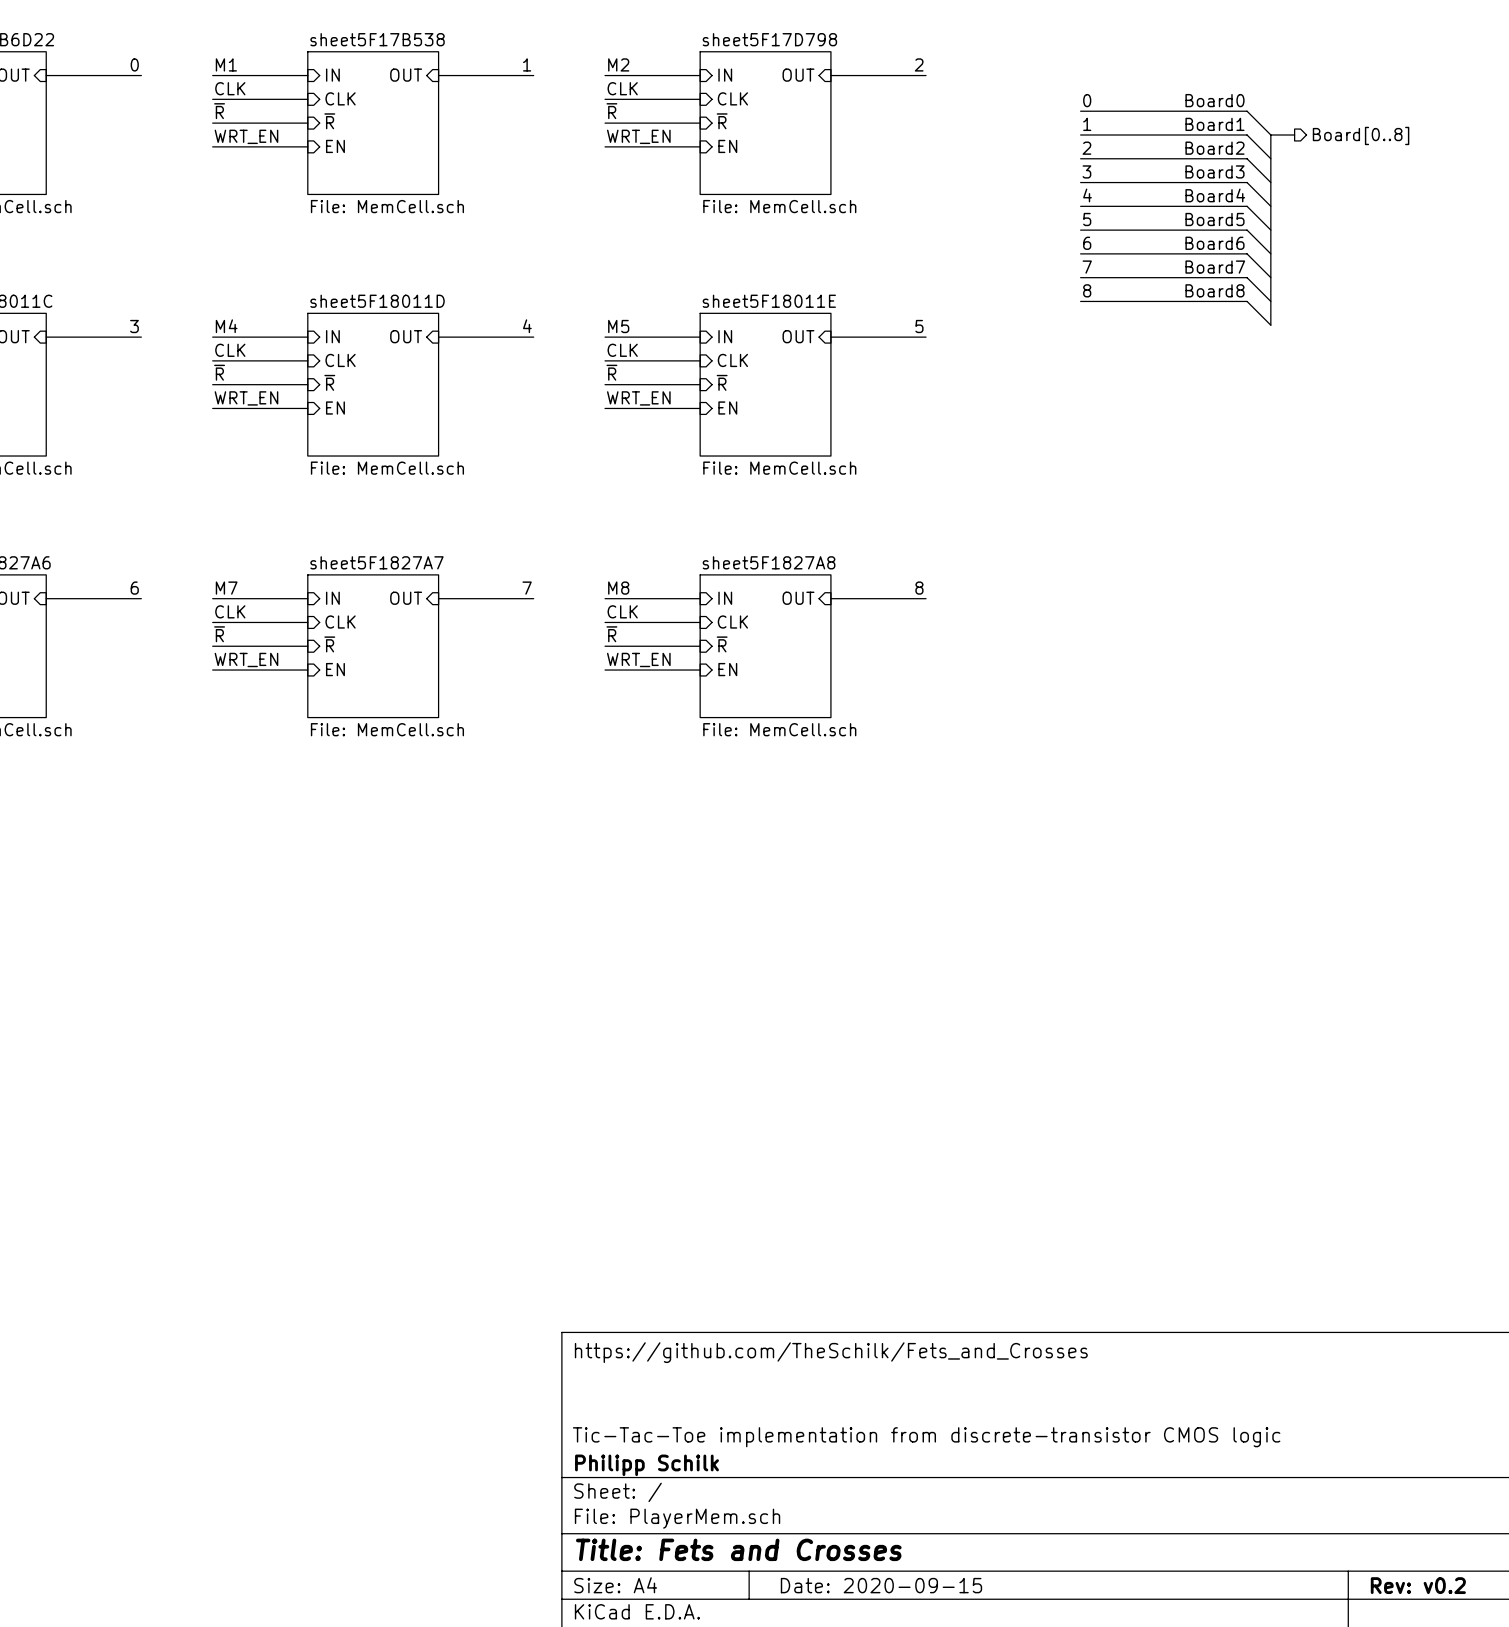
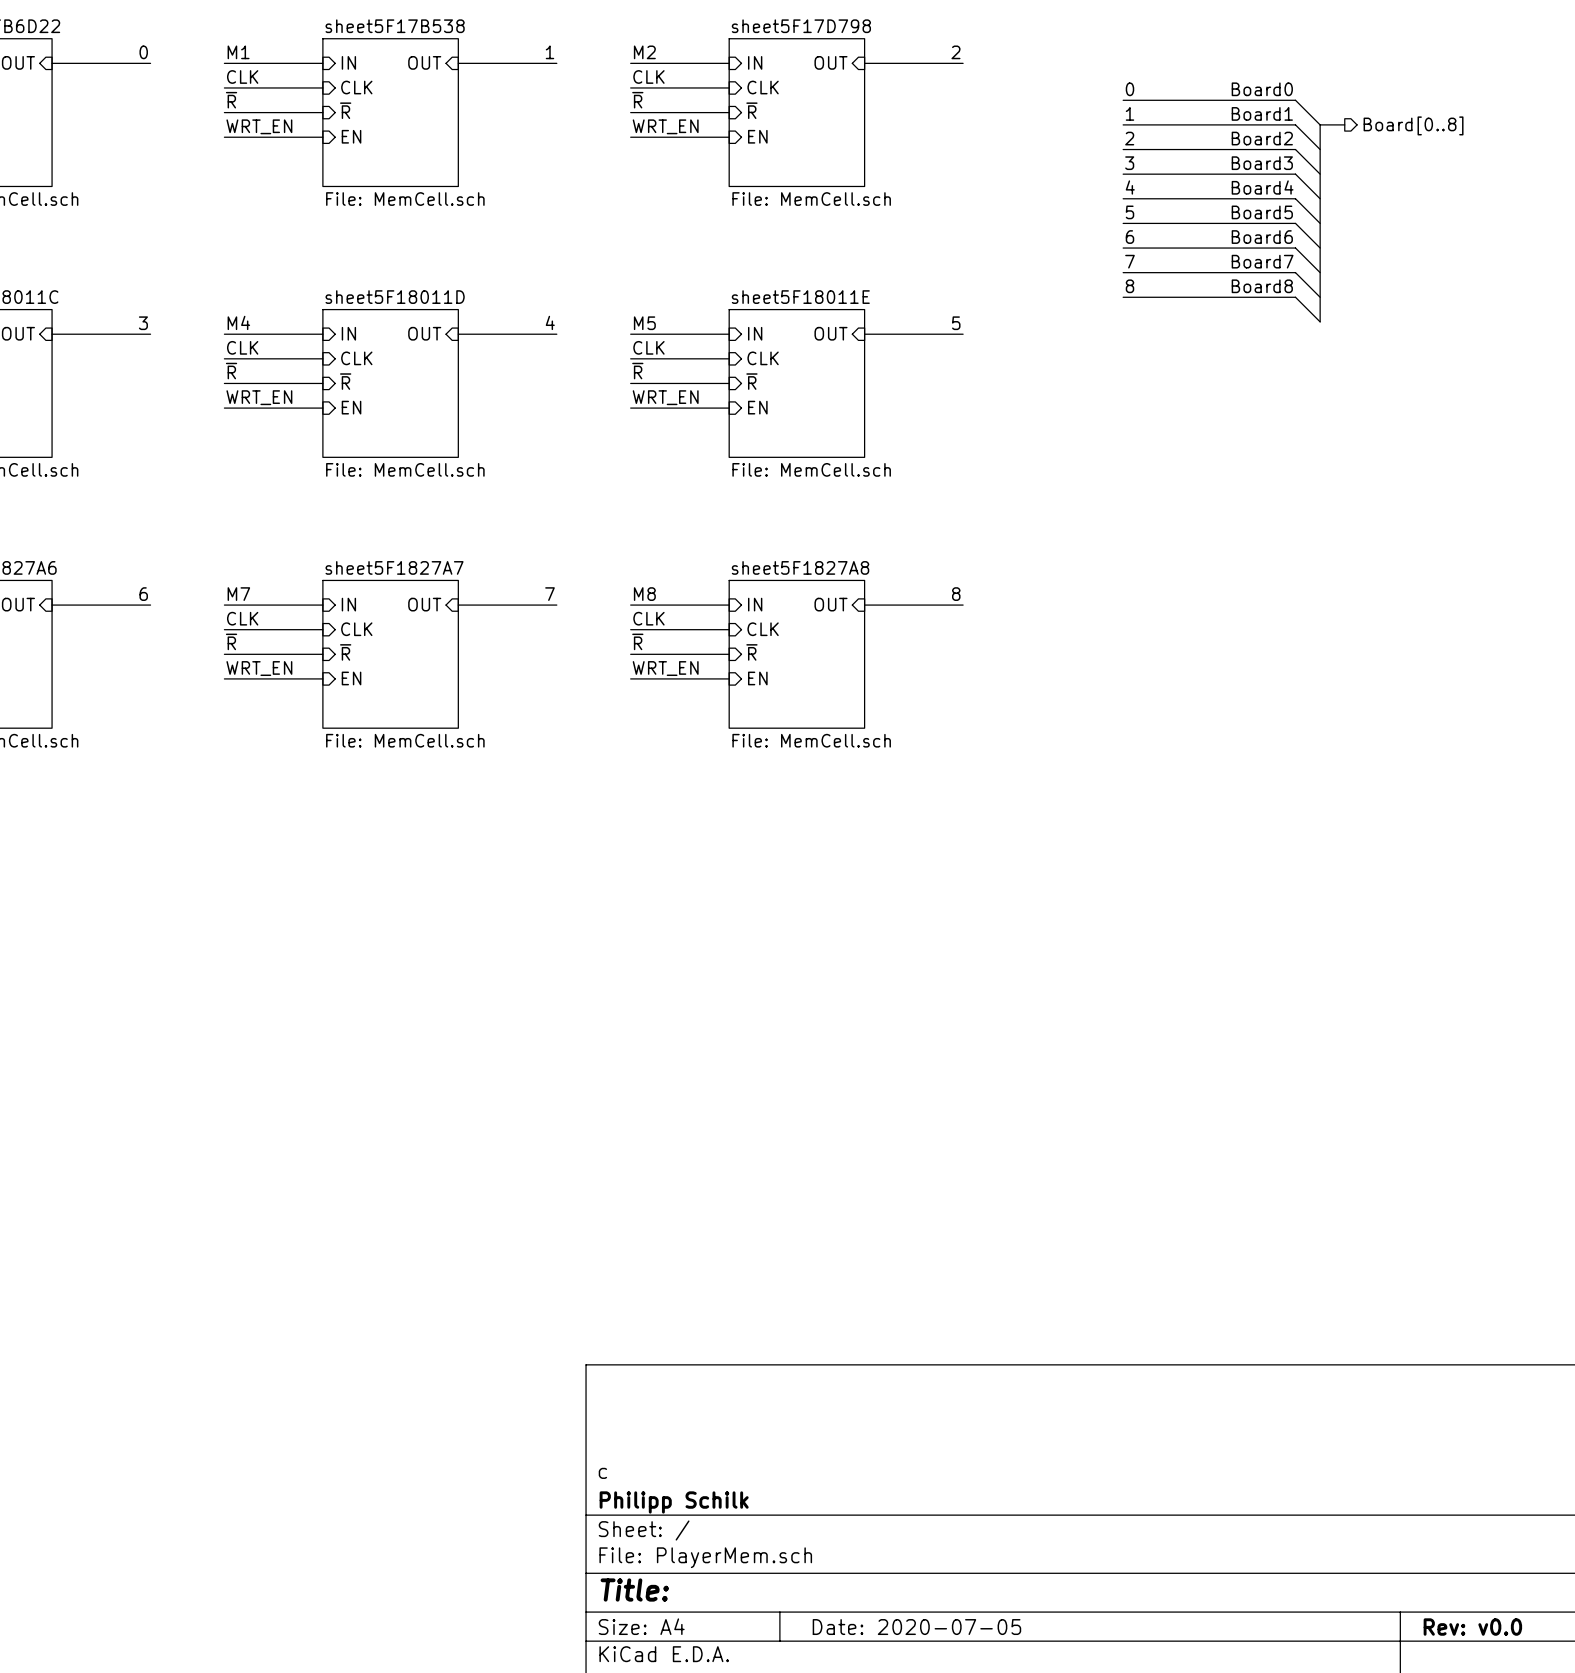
title block: https://github.com/TheSchilk/Fets_and_Crosses (831, 1352) -> none
title block: Tic-Tac-Toe implementation from discrete-transistor CMOS logic (926, 1437) -> c (602, 1473)
title block: Title: Fets and Crosses (738, 1549) -> Title: (634, 1590)
title block: Date: 2020-09-15 (881, 1585) -> Date: 2020-07-05 (916, 1627)
title block: Rev: v0.2 (1418, 1585) -> Rev: v0.0 (1472, 1627)

